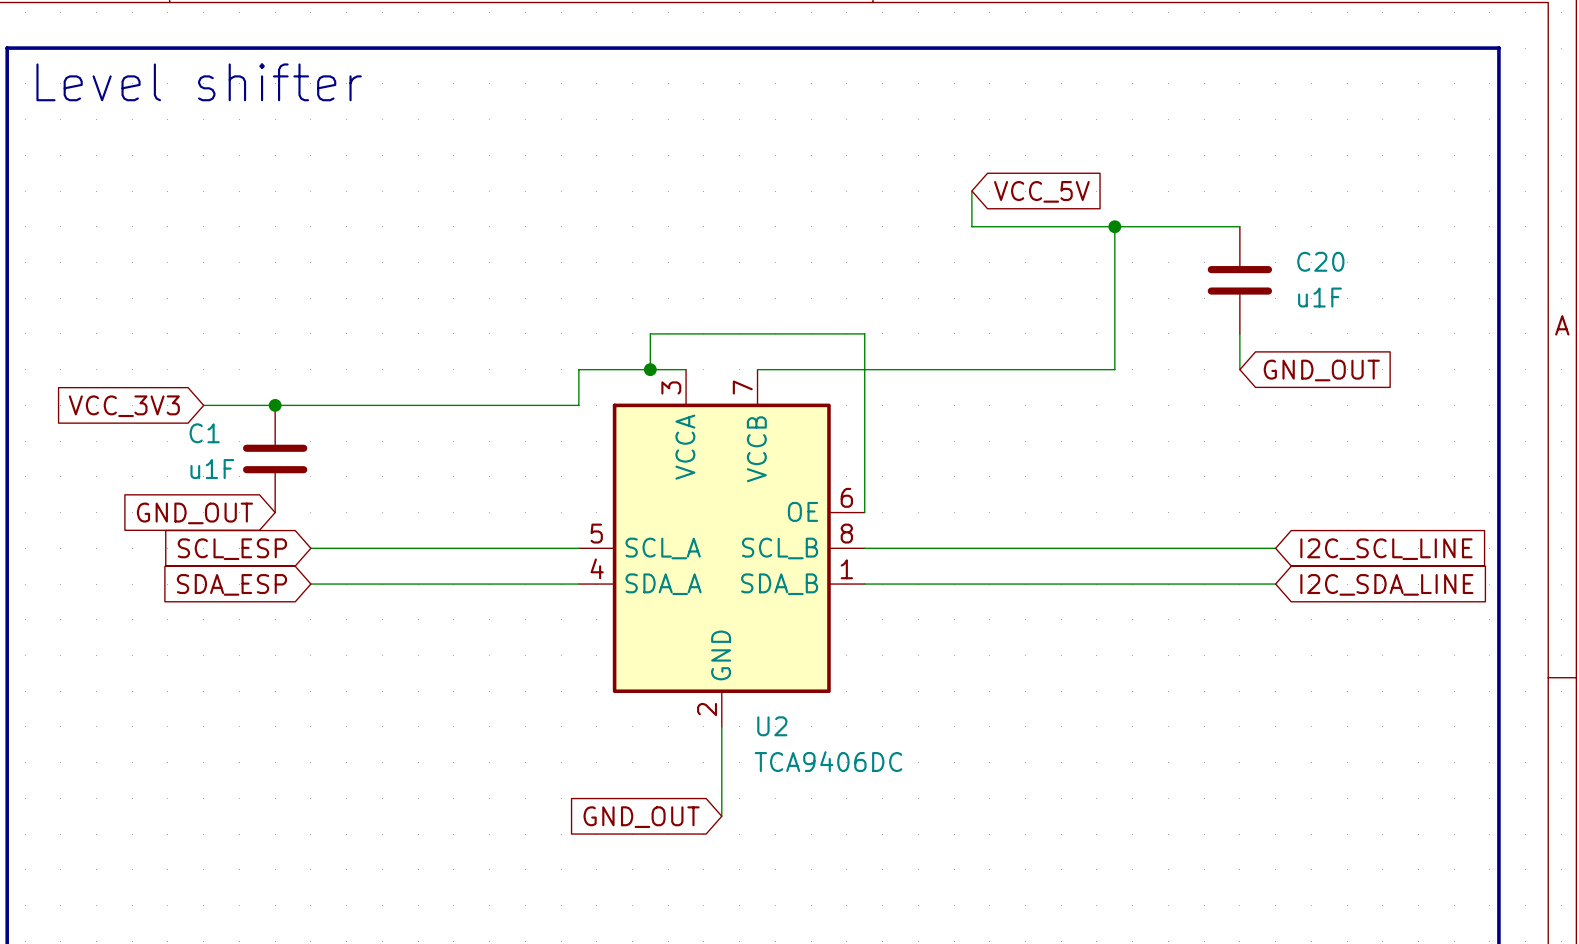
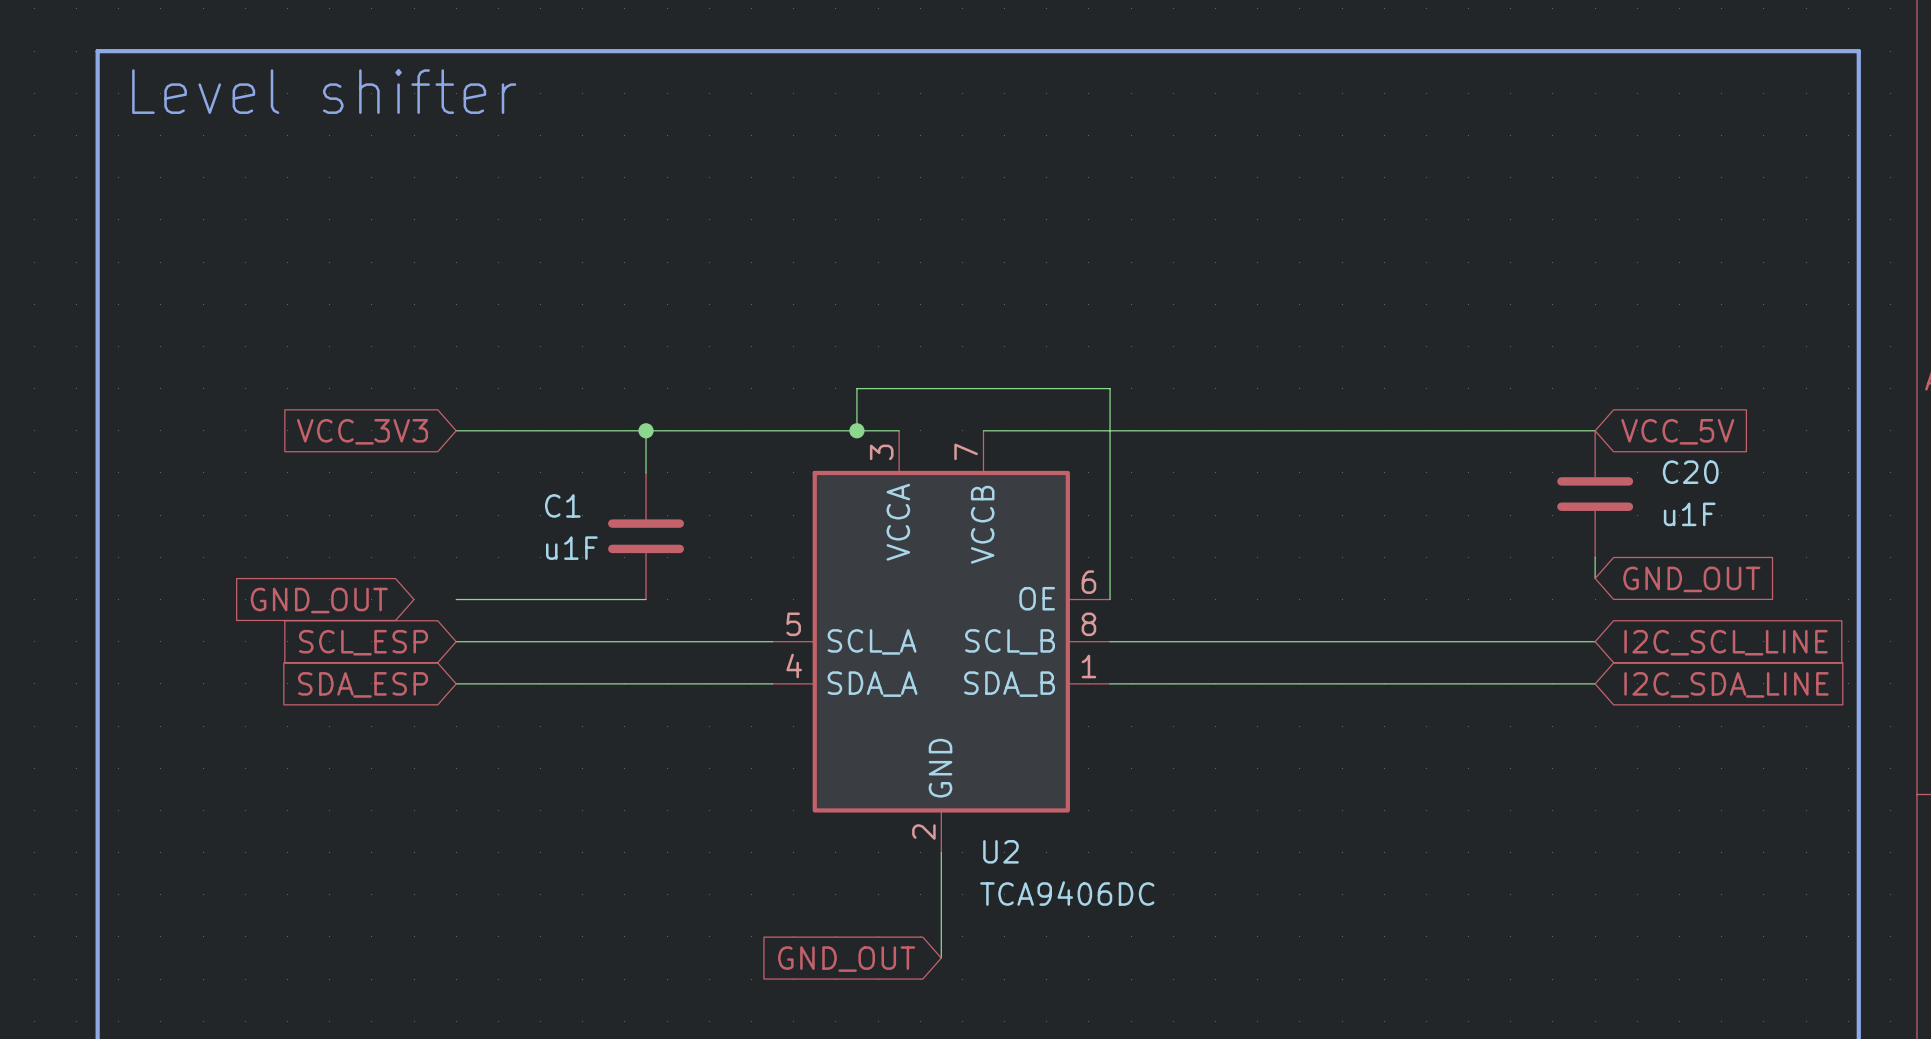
wire: (971, 191) (971, 226) (1239, 226) -> none
global label: VCC_5V (1041, 191) -> none
wire: (1114, 226) (1114, 369) -> (1595, 430) (1405, 430)
junction: (1114, 226) -> none
C20 position: (1239, 280) -> (1595, 494)
wire: (1239, 333) (1239, 369) -> none
wire: none -> (646, 430) (646, 472)
junction: none -> (646, 430)
wire: (578, 369) (578, 405) (203, 405) -> (772, 430) (456, 430)
global label position: GND_OUT (1321, 370) -> GND_OUT (1691, 579)
global label: none -> VCC_5V (1677, 431)
junction: (275, 405) -> none
global label position: VCC_3V3 (124, 406) -> VCC_3V3 (362, 431)
C1 position: (275, 458) -> (646, 536)
wire: none -> (1595, 557) (1595, 578)
wire: none -> (456, 599) (646, 599)

